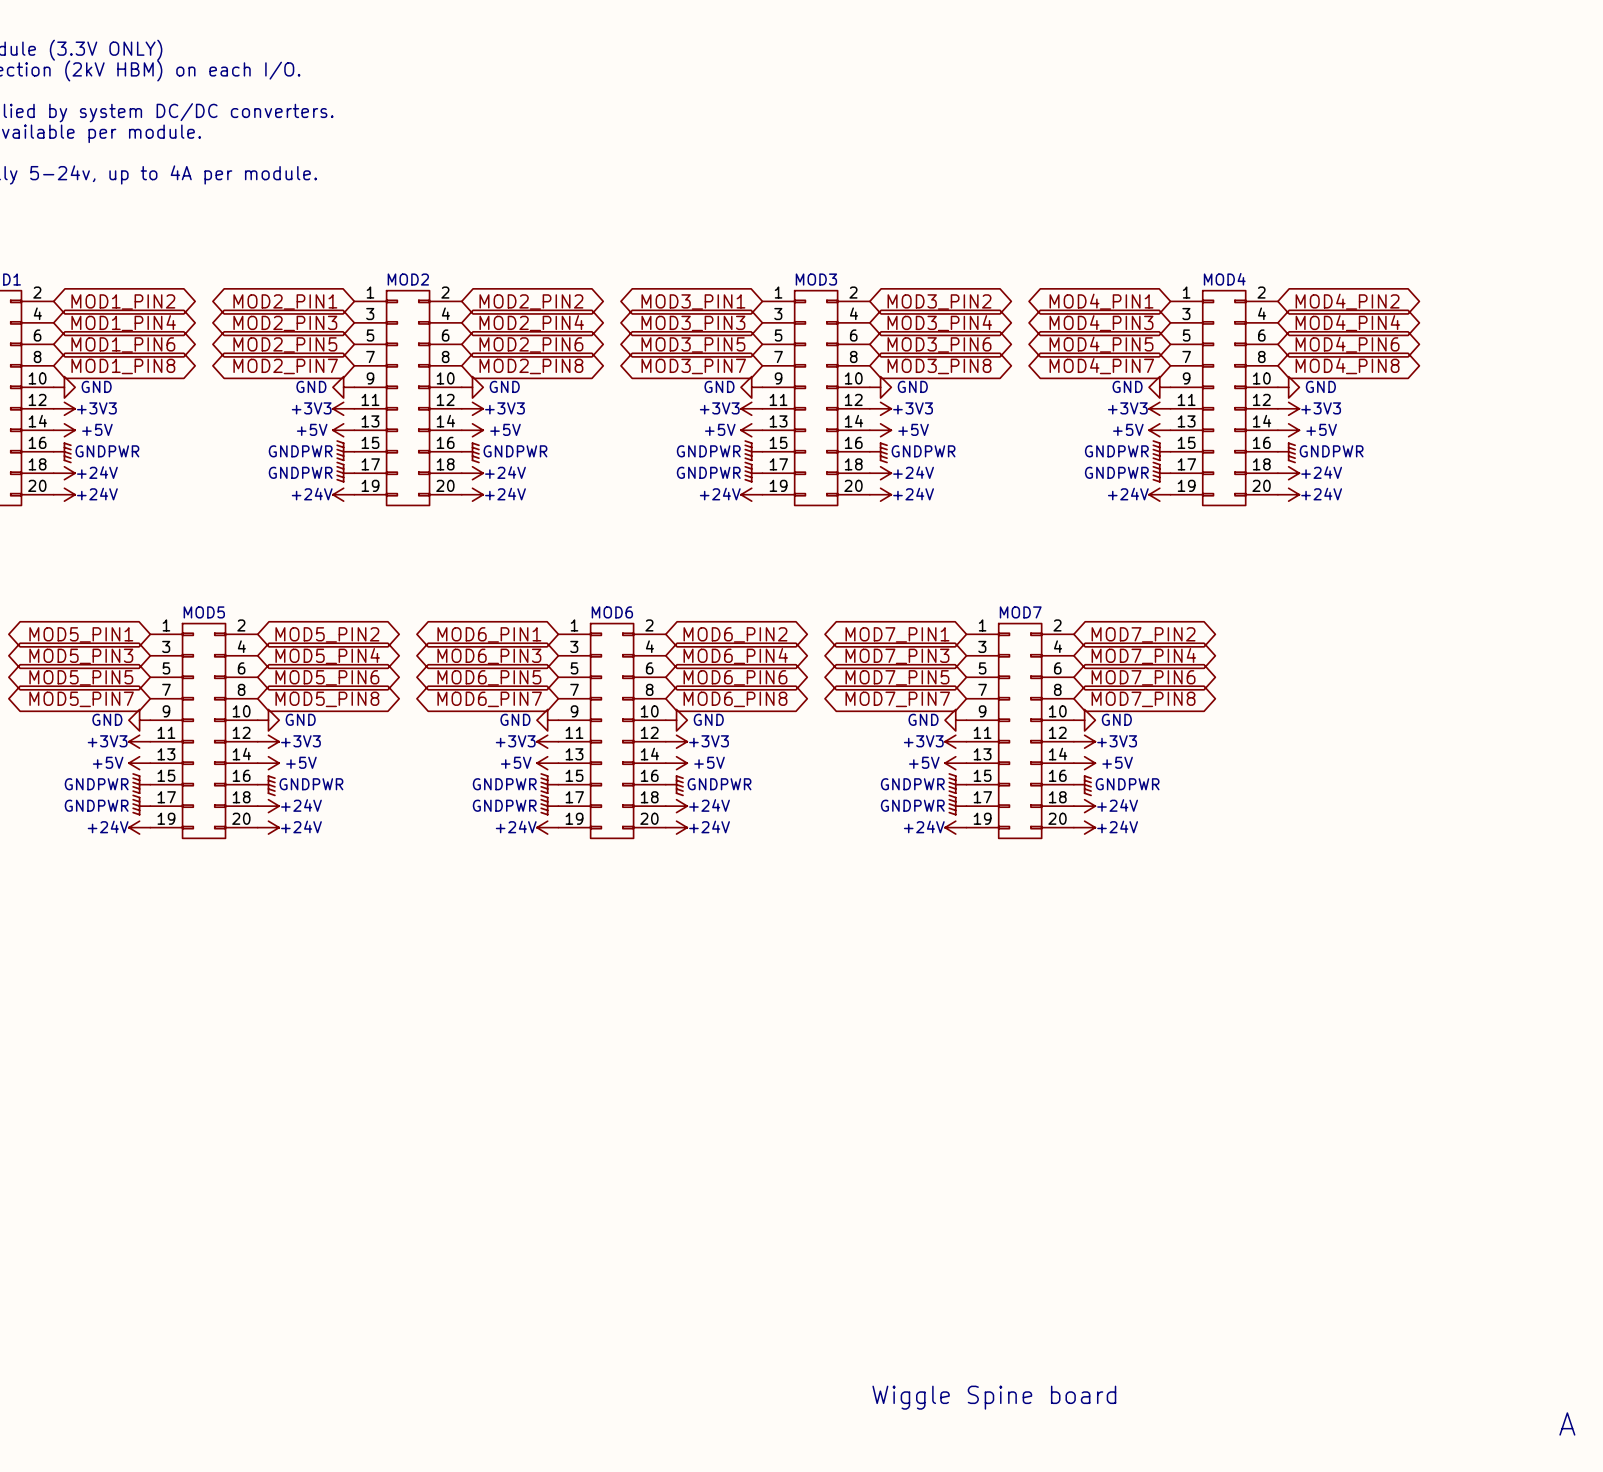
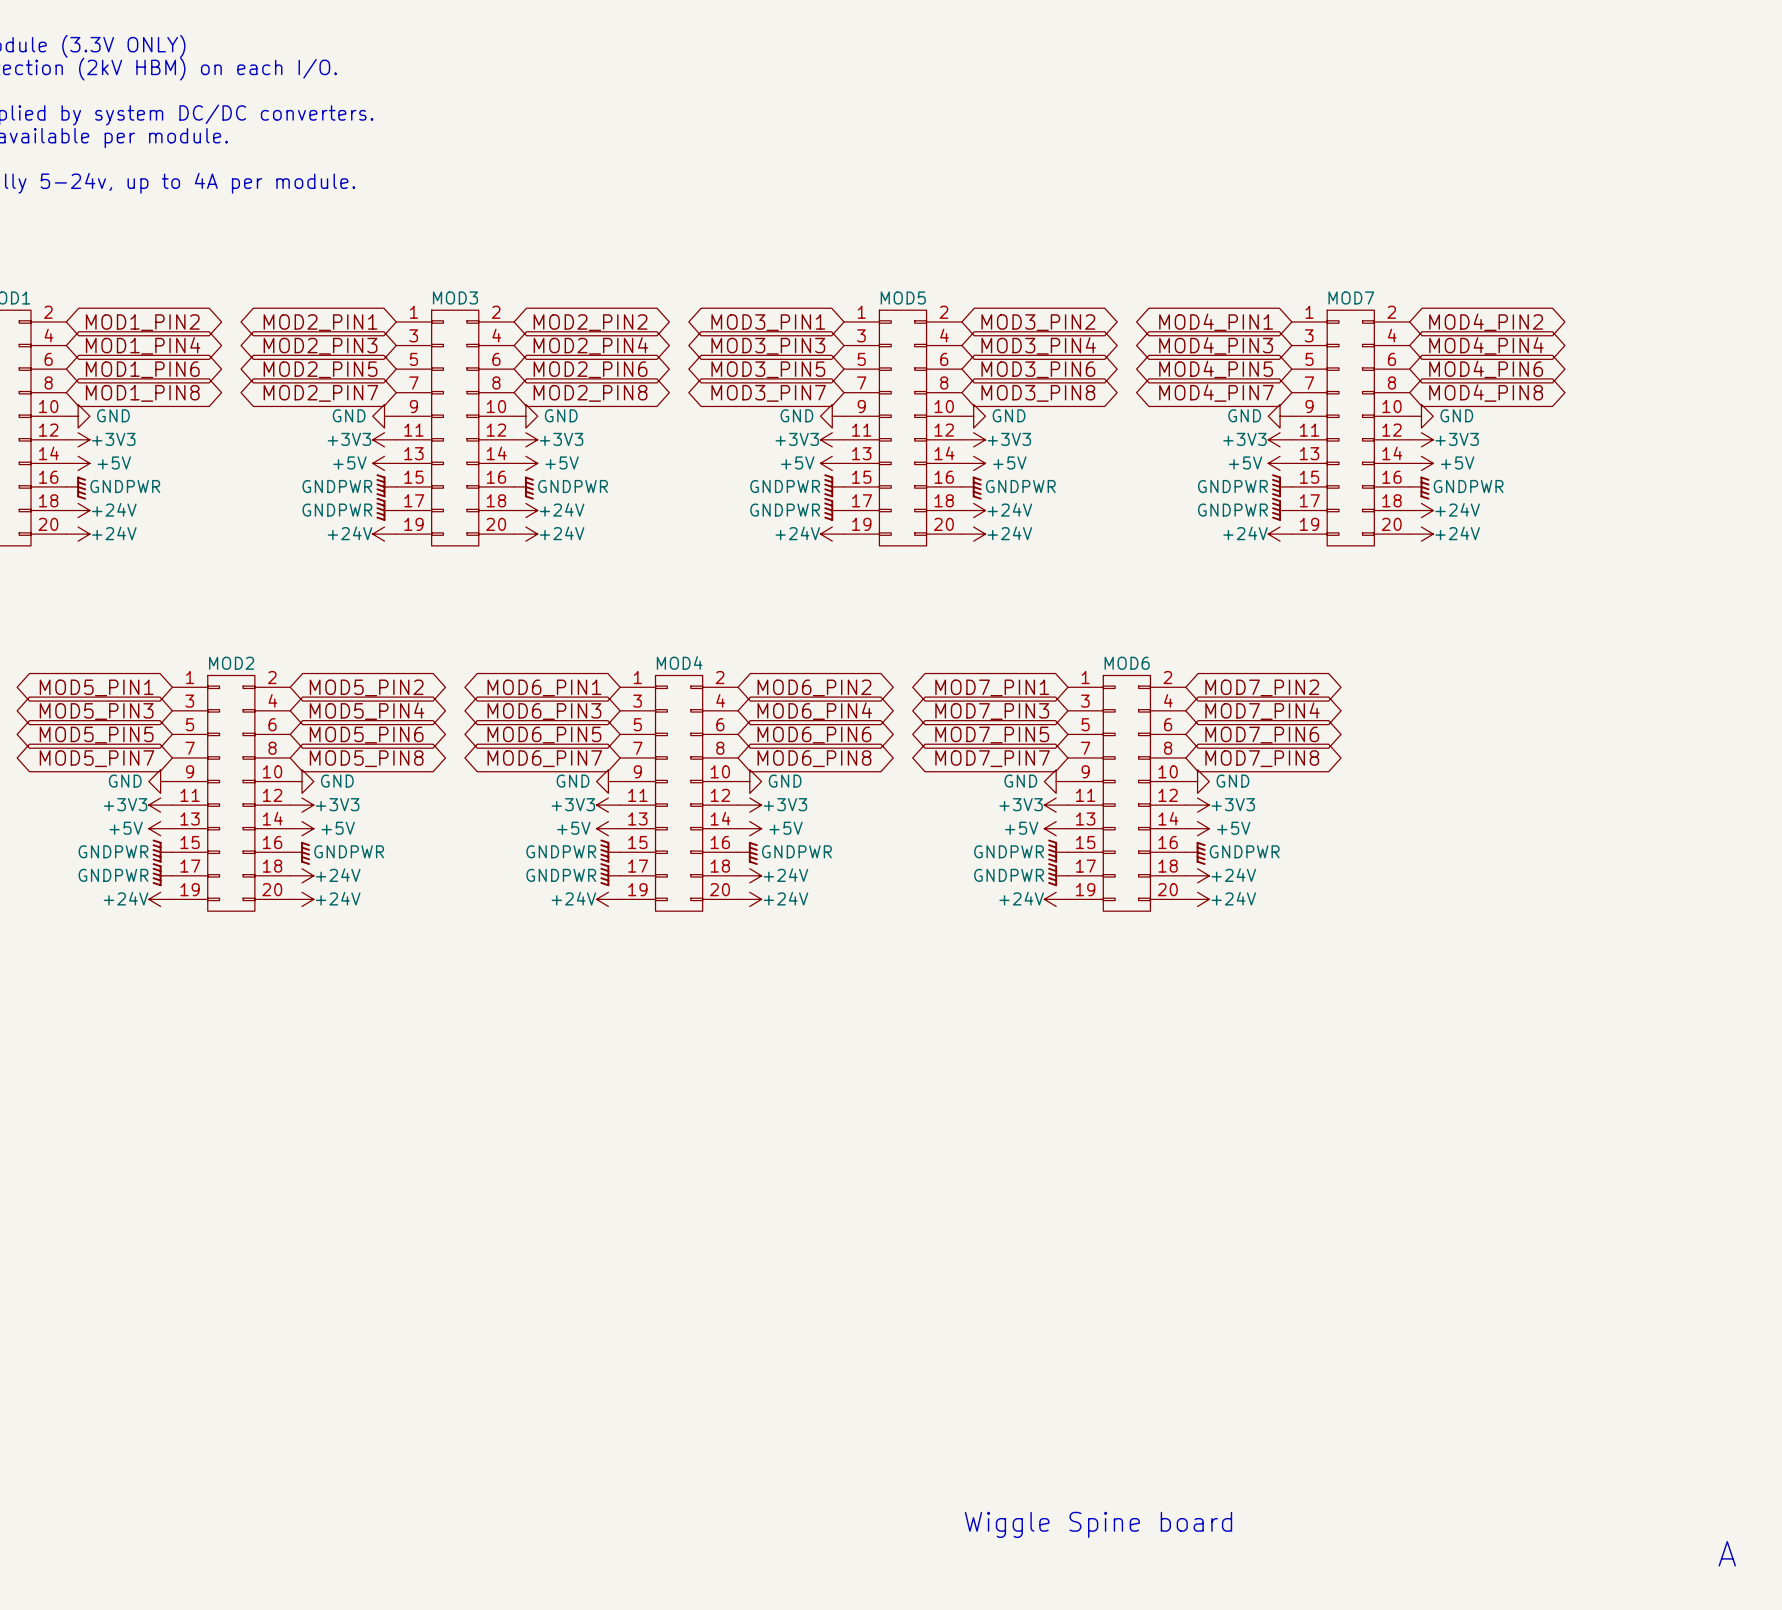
MOD2 name: MOD2 (408, 279) -> MOD3 (455, 297)
MOD3 name: MOD3 (816, 279) -> MOD5 (903, 297)
MOD4 name: MOD4 (1224, 279) -> MOD7 (1351, 297)
MOD5 name: MOD5 (204, 612) -> MOD2 (231, 663)
MOD6 name: MOD6 (612, 612) -> MOD4 (679, 662)
MOD7 name: MOD7 (1020, 612) -> MOD6 (1127, 663)

